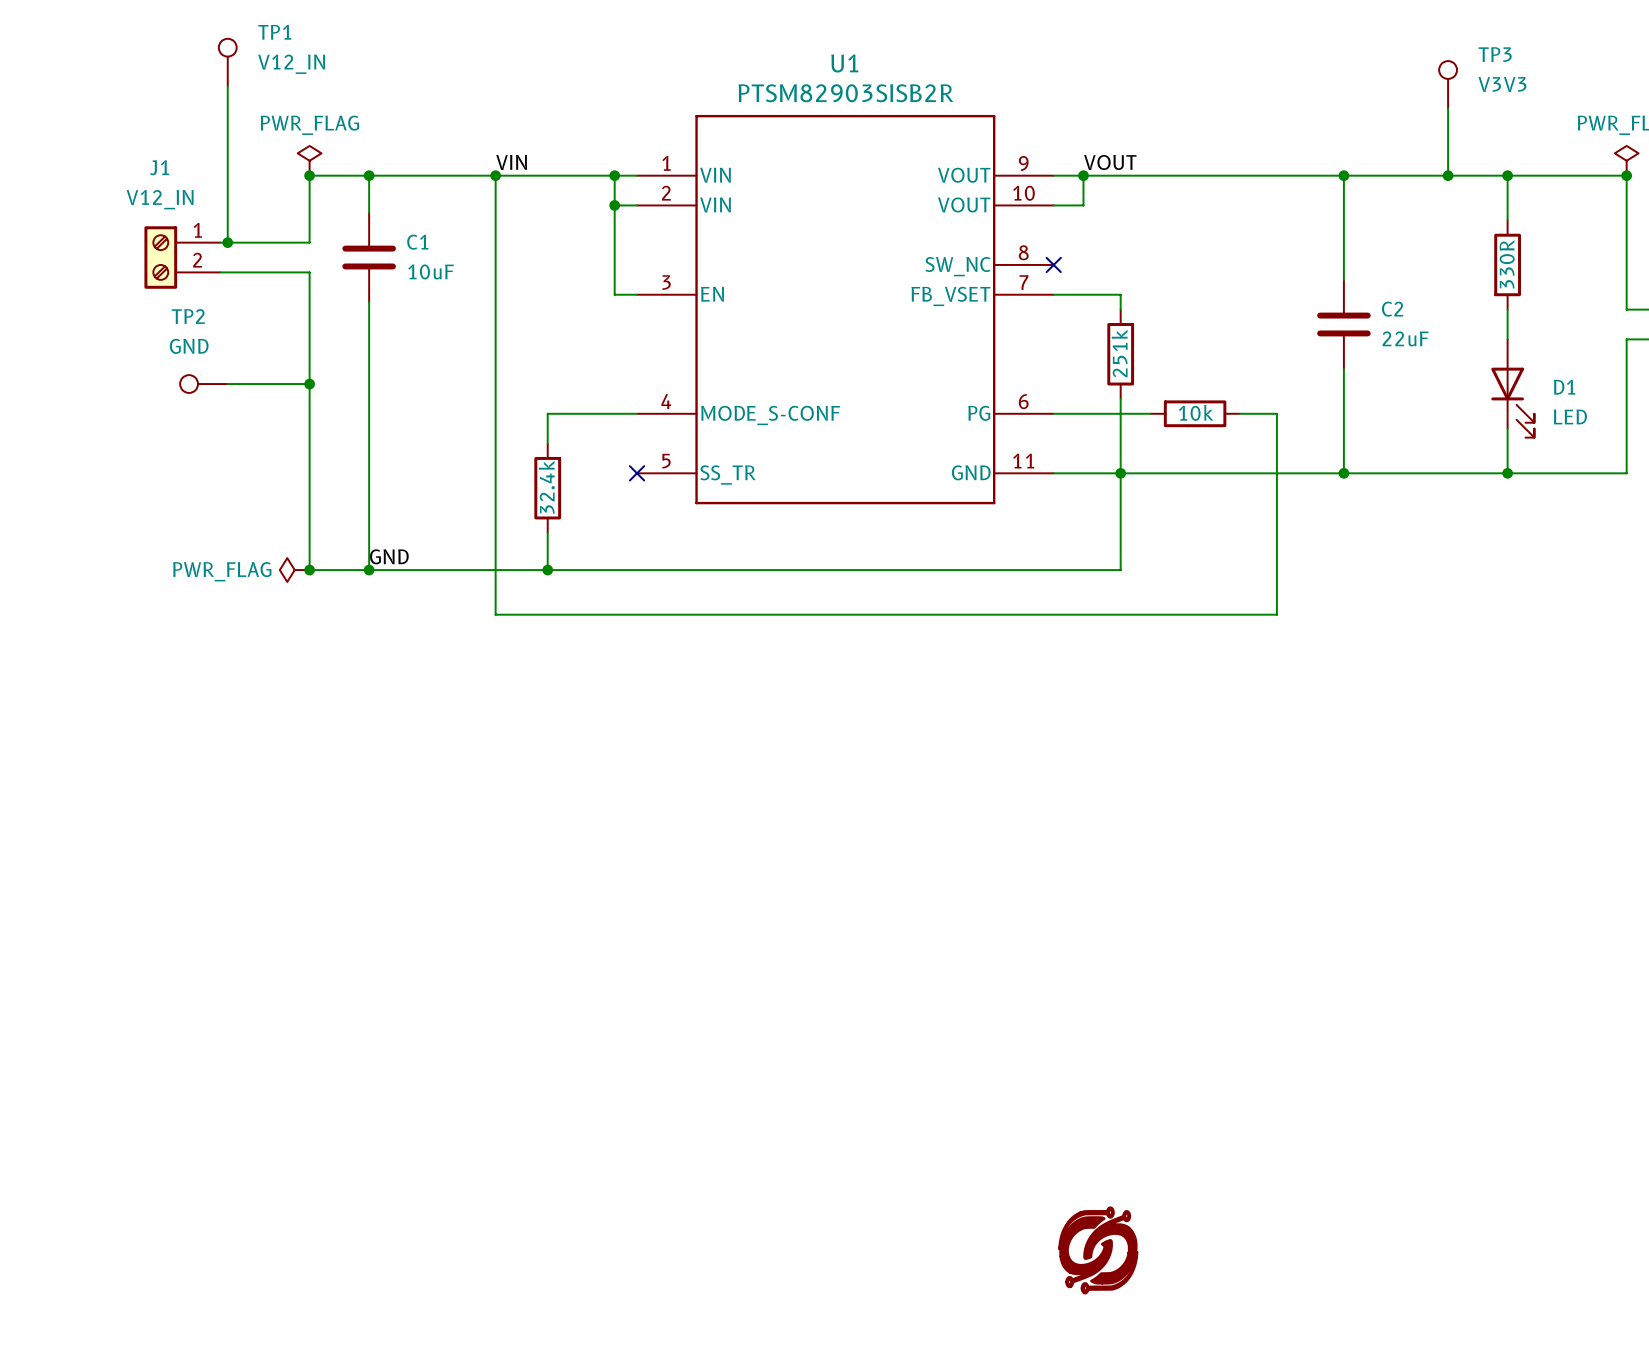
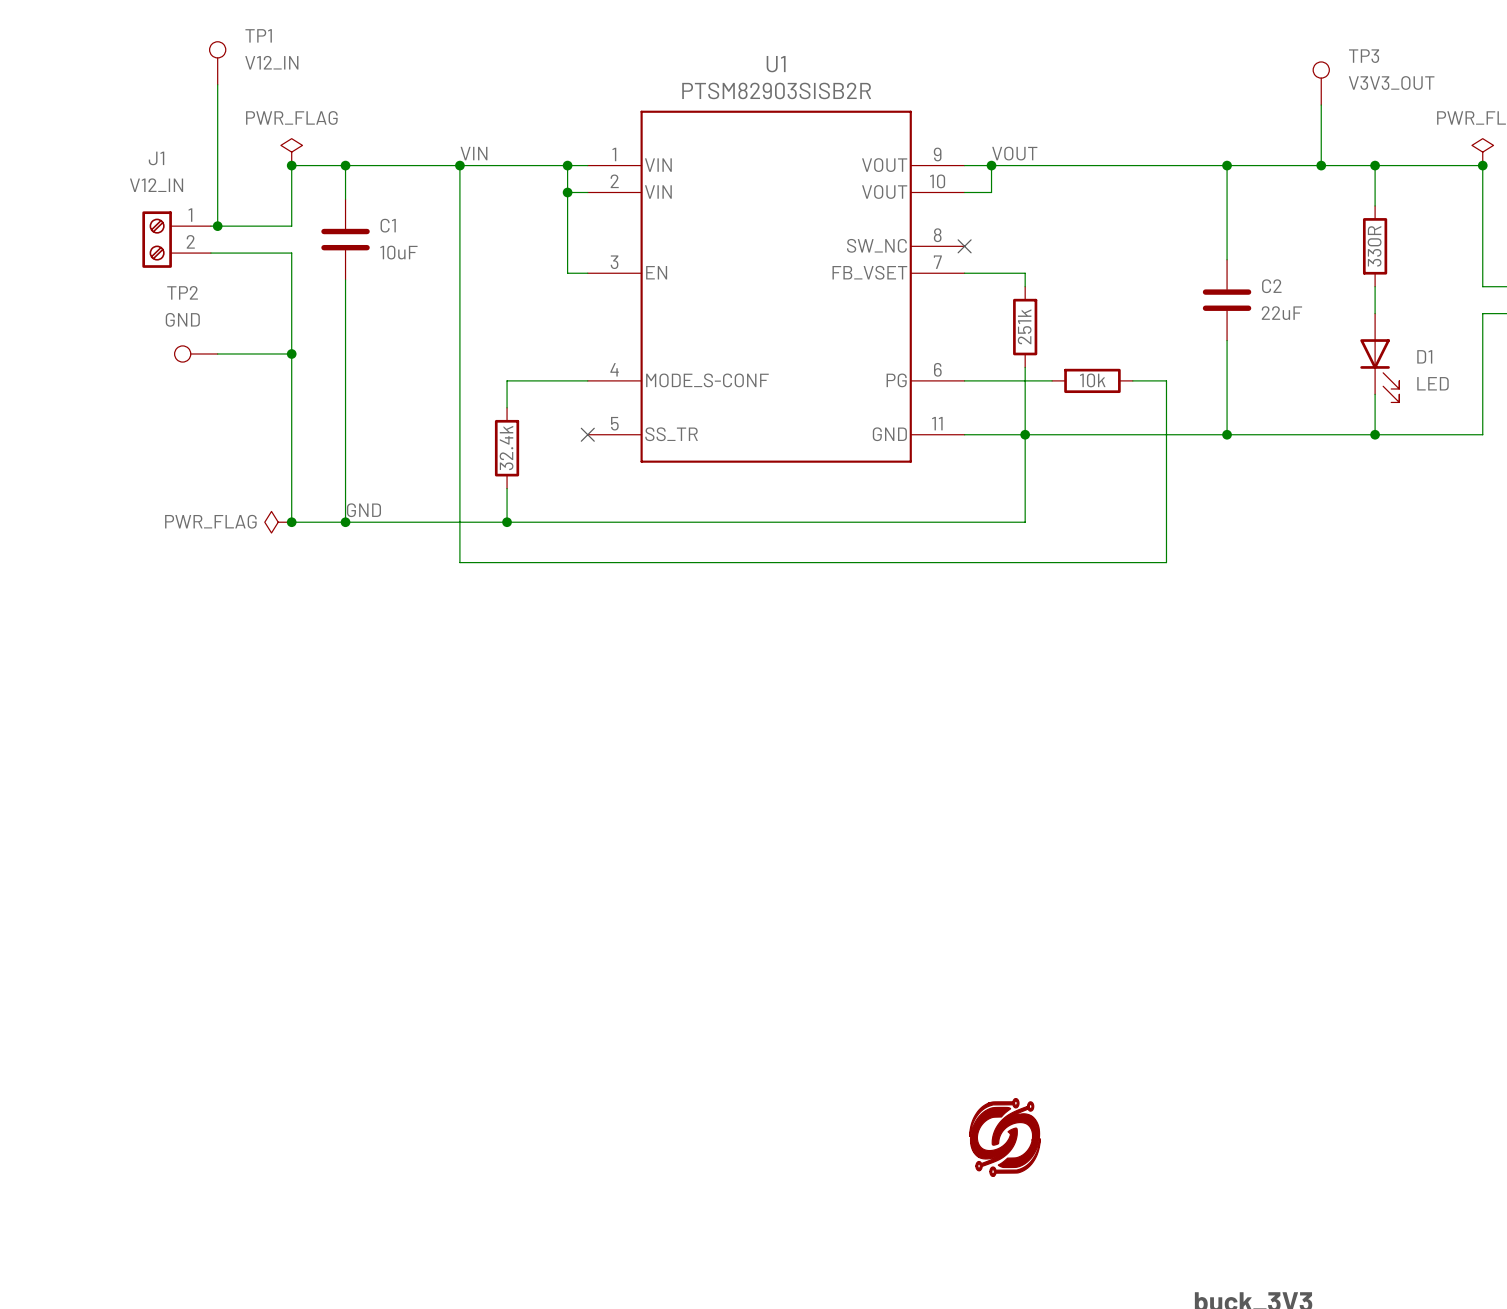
TP3 value: V3V3 (1502, 84) -> V3V3_OUT (1391, 82)

